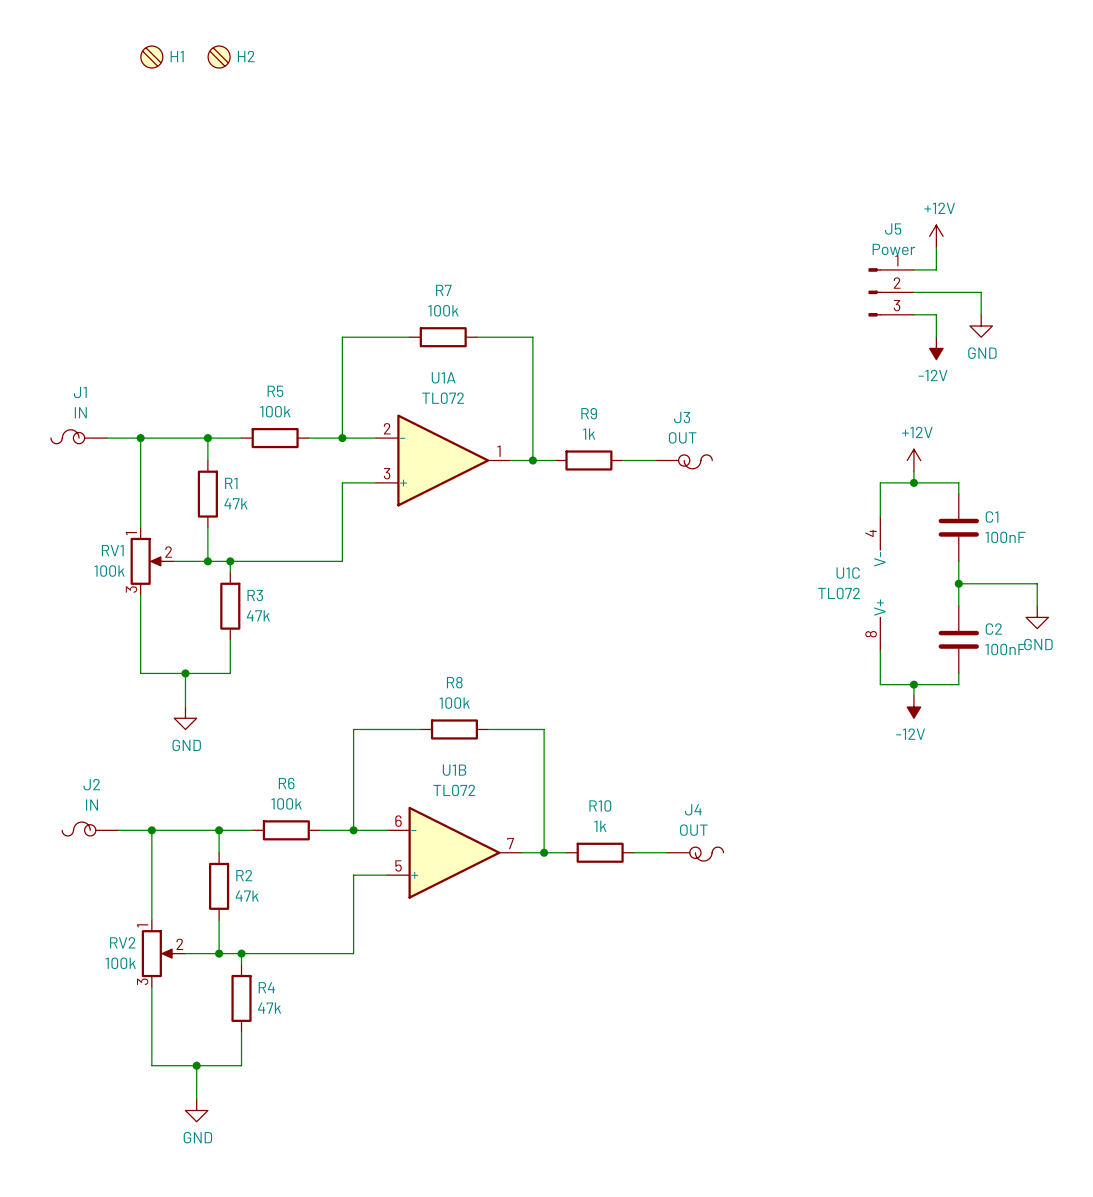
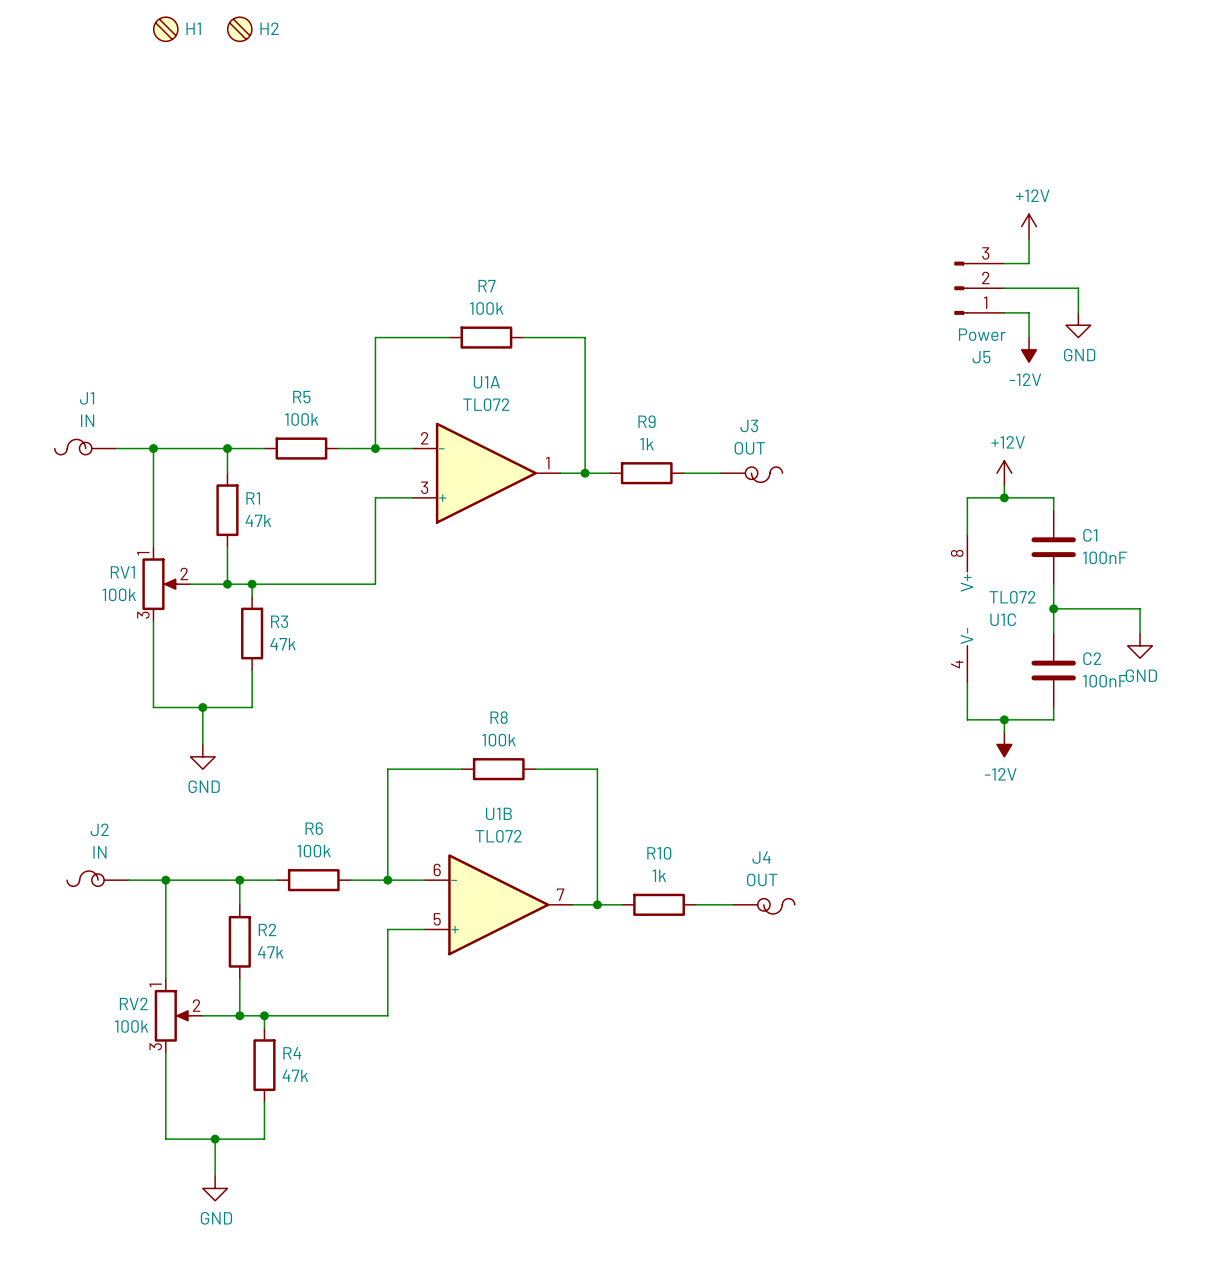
J5 flip: as is (874, 292) -> up-down (961, 288)
U1C rotation: 0° (880, 583) -> 180° (967, 608)

